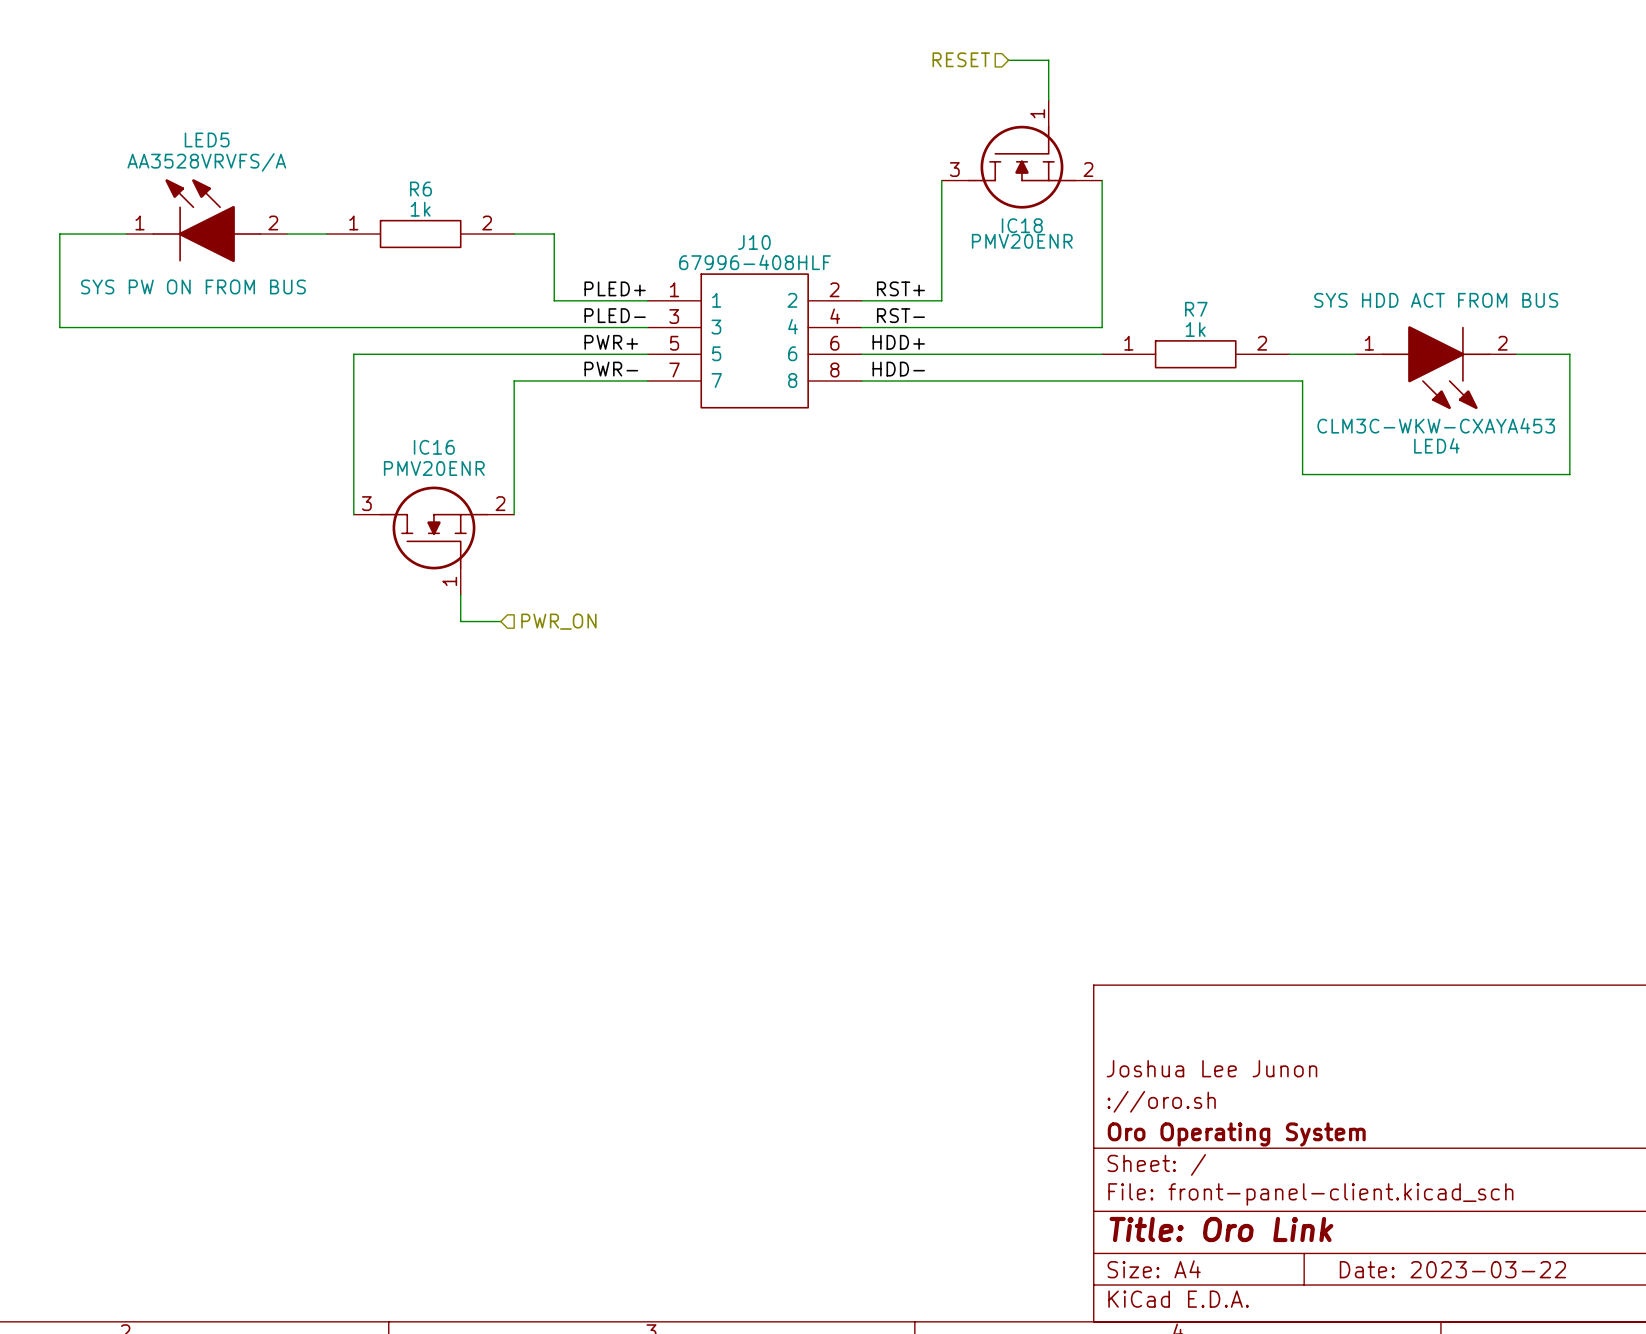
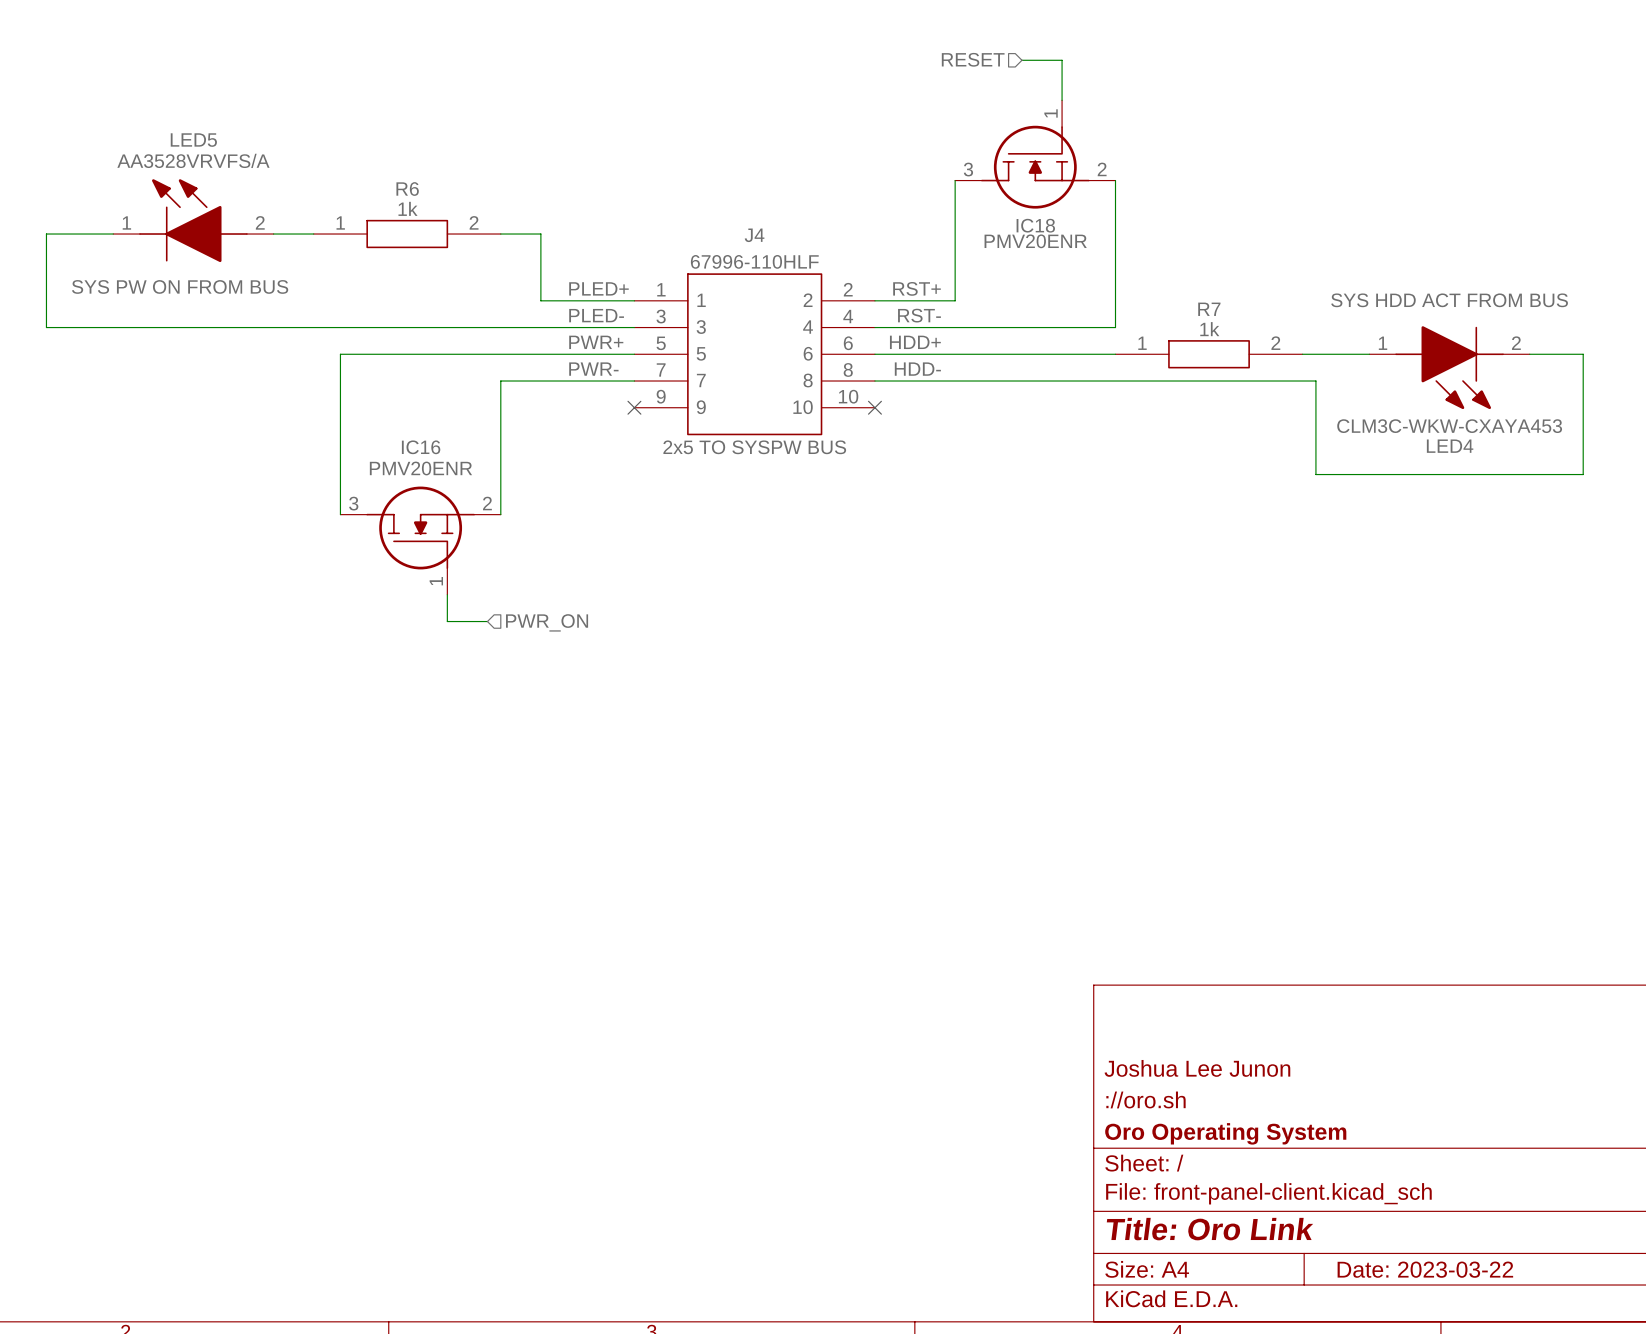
hierarchical label position: RESET (961, 59) -> RESET (973, 59)
wire: (1008, 60) (1021, 60) -> none
wire: (1048, 60) (1048, 100) -> (1048, 60) (1062, 60) (1062, 100)
IC18 position: (1021, 154) -> (1035, 154)
wire: (941, 180) (941, 300) -> (955, 180) (955, 300) (941, 300)
wire: (1102, 180) (1102, 327) -> (1115, 180) (1115, 327) (1102, 327)
LED5 position: (206, 220) -> (193, 220)
wire: (59, 234) (59, 327) -> (59, 234) (46, 234) (46, 327) (59, 327)
R6 position: (420, 234) -> (407, 234)
wire: (540, 234) (554, 234) (554, 300) -> (540, 234) (540, 300) (554, 300)
label position: PLED+ (615, 288) -> PLED+ (598, 288)
label position: RST+ (900, 288) -> RST+ (917, 288)
label position: PLED- (615, 315) -> PLED- (596, 315)
label position: RST- (900, 315) -> RST- (919, 315)
J10: 67996-408HLF (754, 340) -> none
label position: PWR+ (611, 342) -> PWR+ (596, 342)
label position: HDD+ (898, 342) -> HDD+ (915, 342)
wire: (353, 354) (353, 514) -> (353, 354) (340, 354) (340, 514)
J4: none -> 67996-110HLF (754, 354)
R7 position: (1195, 354) -> (1209, 354)
wire: (1569, 354) (1569, 474) -> (1569, 354) (1583, 354) (1583, 474) (1569, 474)
LED4 position: (1436, 367) -> (1449, 367)
label position: PWR- (611, 369) -> PWR- (593, 369)
label position: HDD- (898, 369) -> HDD- (917, 369)
wire: (514, 381) (514, 514) -> (514, 381) (500, 381) (500, 514)
wire: (1302, 381) (1302, 474) (1315, 474) -> (1302, 381) (1315, 381) (1315, 474)
no-connect mark: none -> (634, 407)
no-connect mark: none -> (874, 407)
IC16 position: (433, 540) -> (420, 540)
wire: (460, 594) (460, 621) -> (447, 594) (447, 621) (460, 621)
wire: (487, 621) (500, 621) -> none
hierarchical label position: PWR_ON (558, 621) -> PWR_ON (547, 622)

